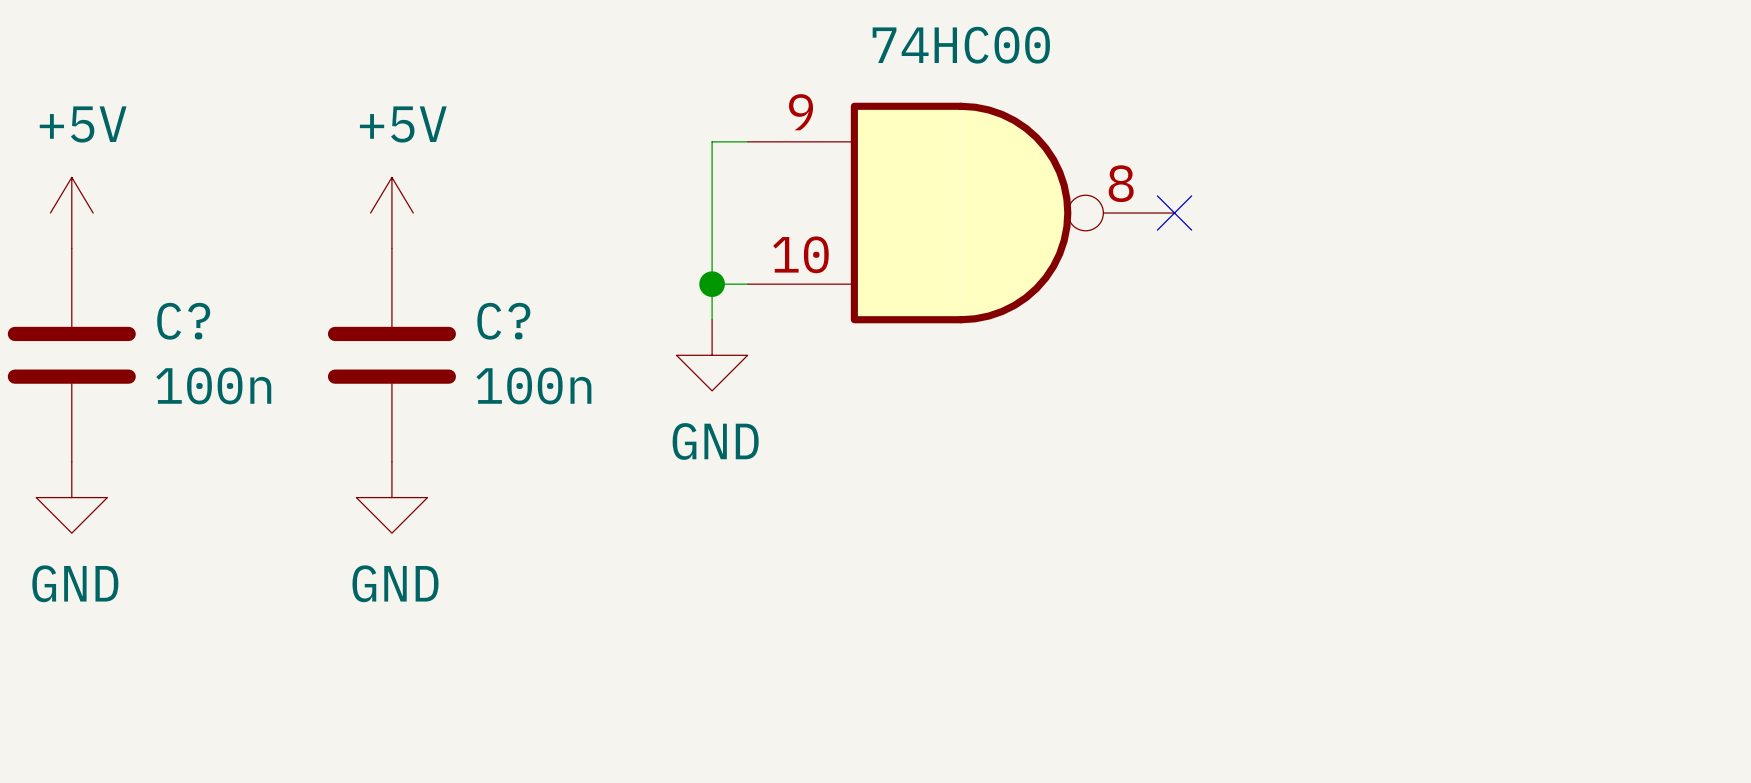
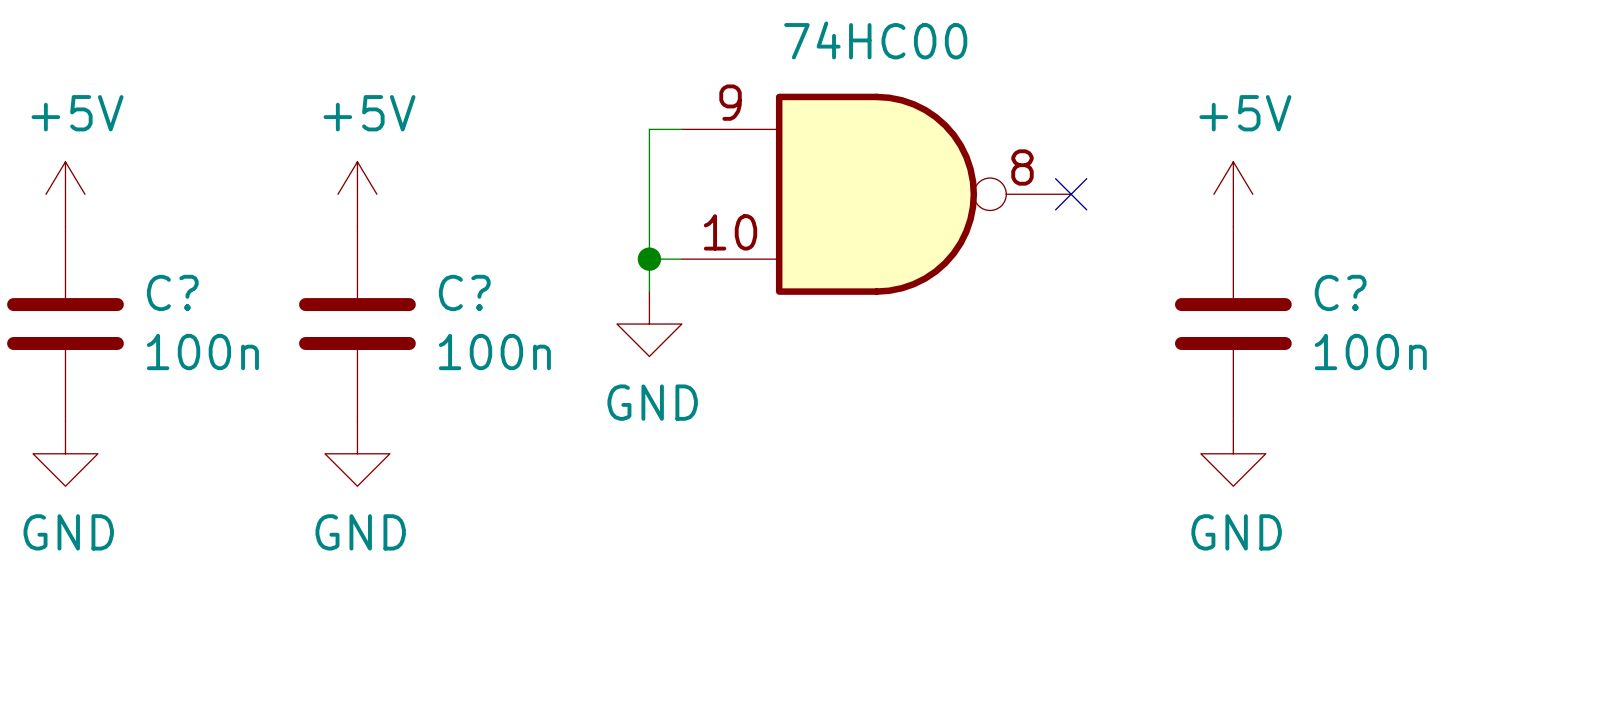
power symbol: none -> +5V (1233, 194)
C?: none -> 100n (1233, 324)
power symbol: none -> GND (1233, 453)

